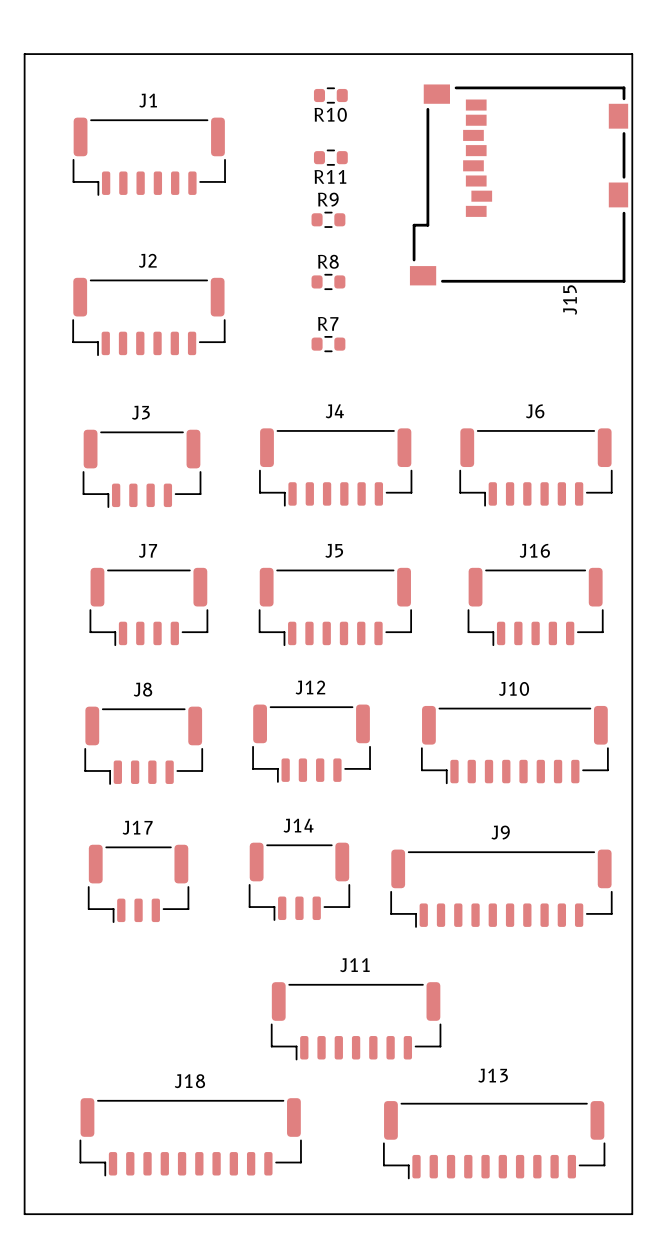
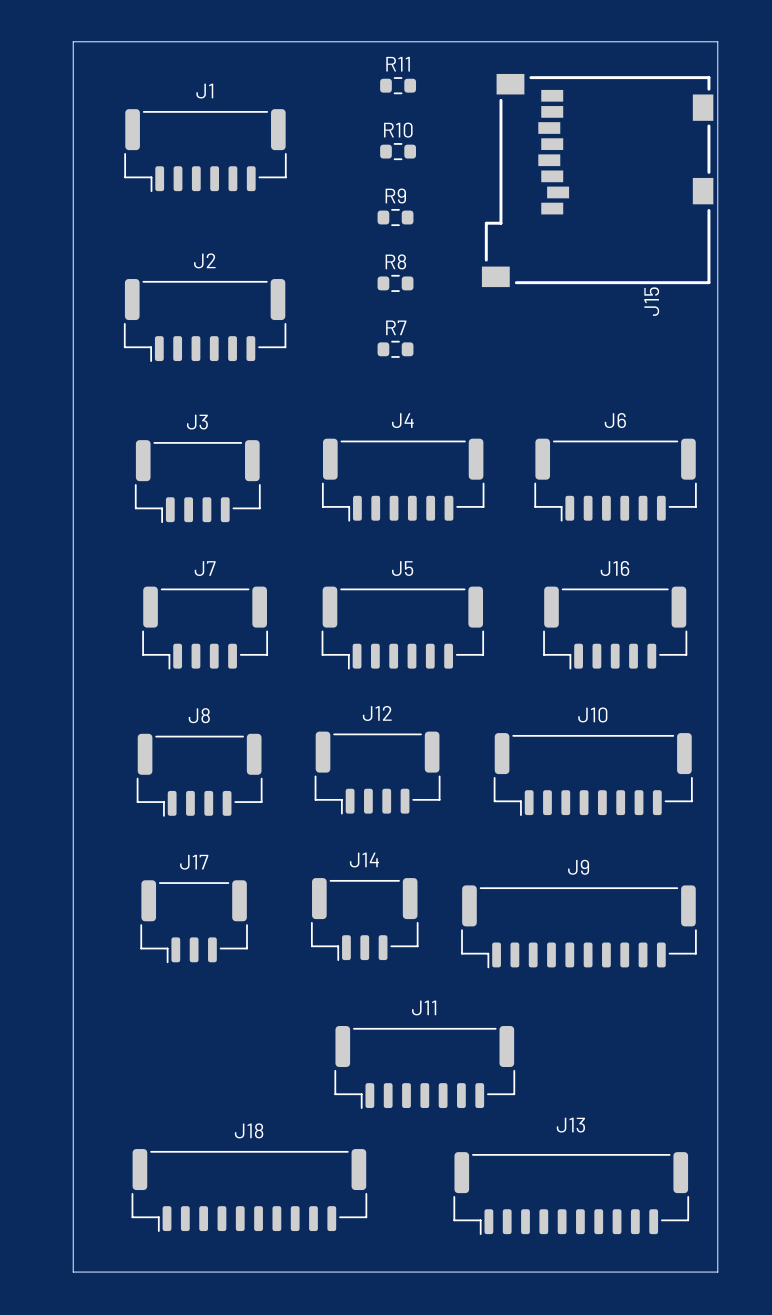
R10 name: R10 (330, 114) -> R11 (398, 64)
R11 name: R11 (330, 176) -> R10 (398, 130)

